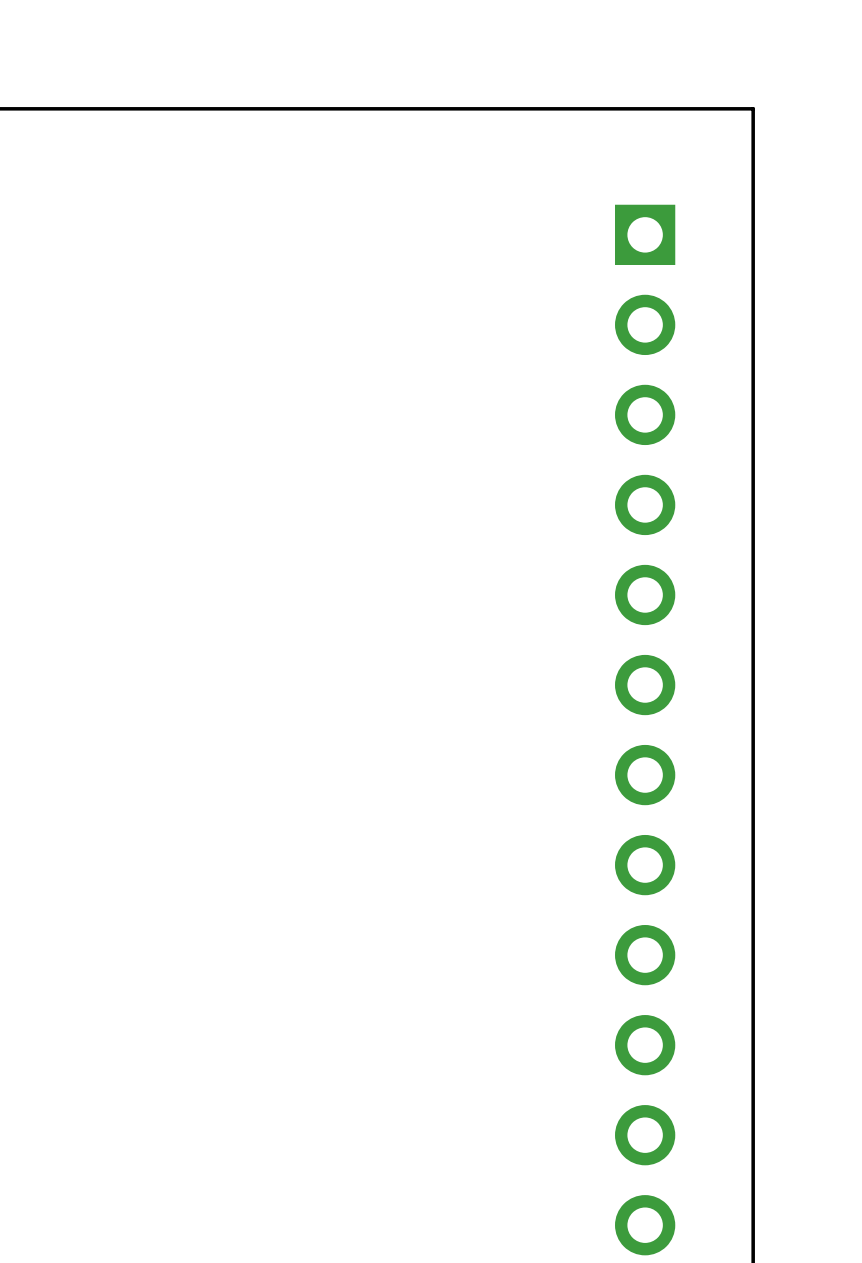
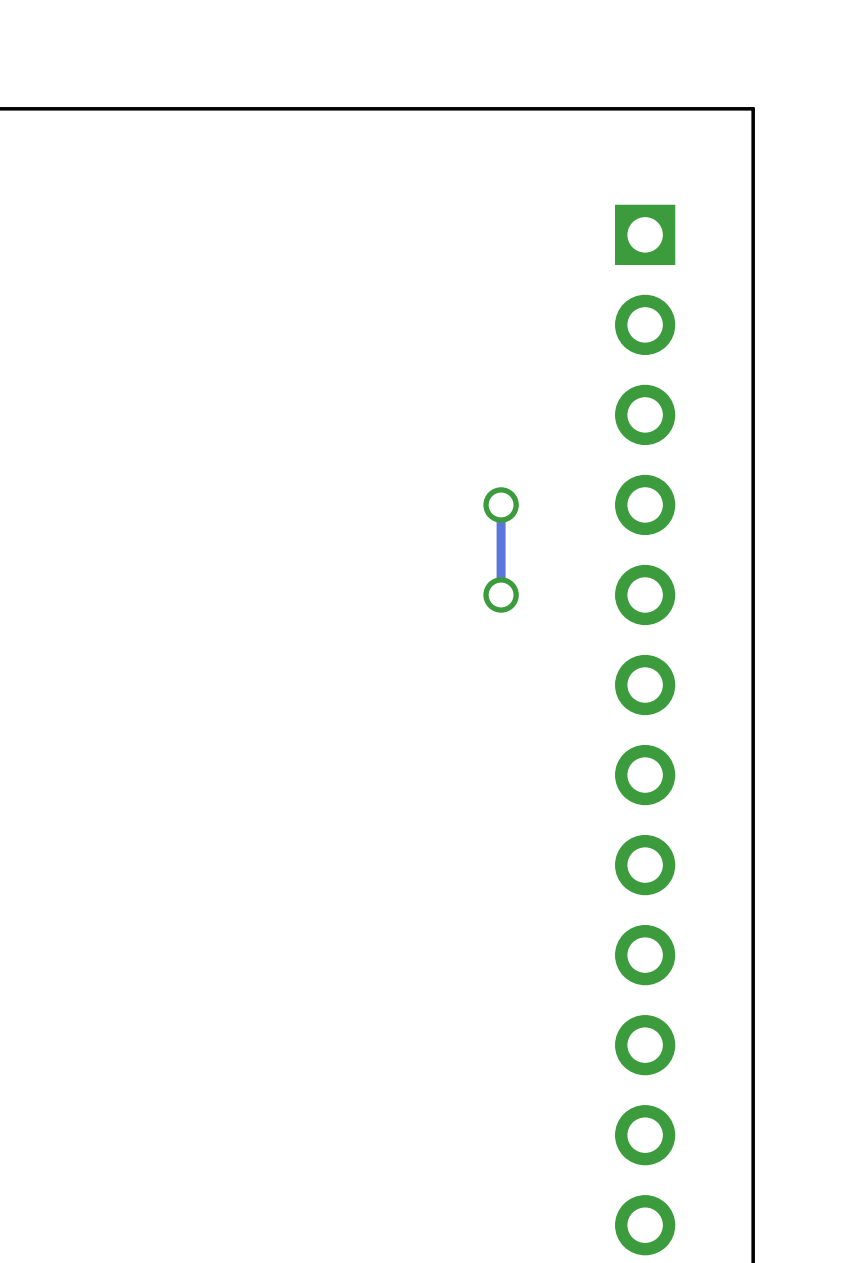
track: none -> (501, 504) (501, 594)
via: none -> (501, 504)
via: none -> (501, 594)

